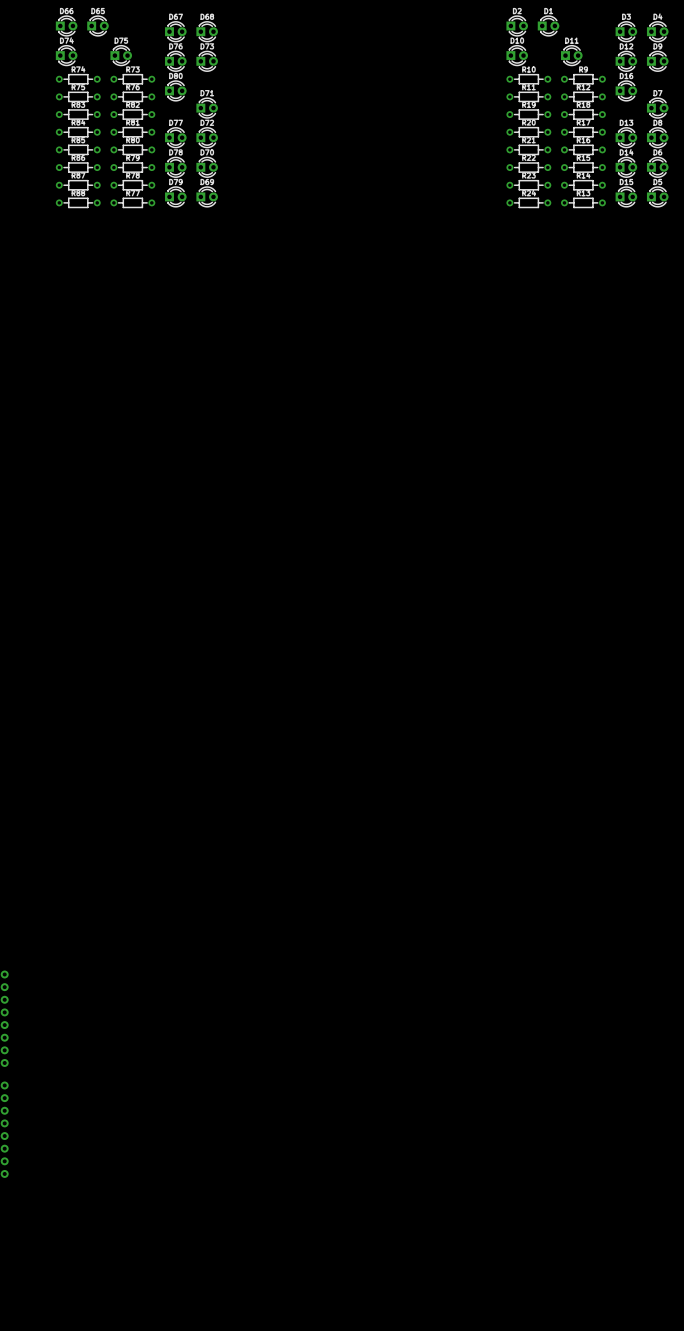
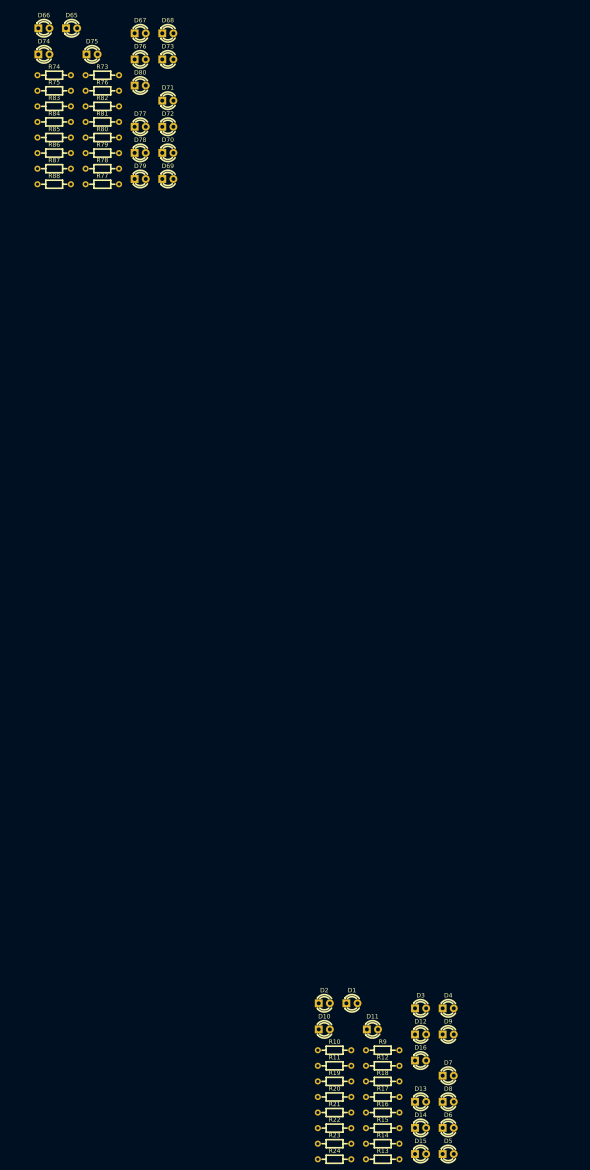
part position: (517, 25) -> (324, 1003)
part position: (548, 25) -> (351, 1003)
part position: (626, 31) -> (420, 1008)
part position: (657, 31) -> (448, 1008)
part position: (517, 55) -> (324, 1029)
part position: (571, 55) -> (372, 1029)
part position: (626, 61) -> (420, 1034)
part position: (657, 61) -> (448, 1034)
part position: (528, 79) -> (334, 1050)
part position: (583, 79) -> (382, 1050)
part position: (626, 90) -> (420, 1060)
part position: (528, 96) -> (334, 1065)
part position: (583, 96) -> (382, 1065)
part position: (657, 108) -> (448, 1075)
part position: (528, 114) -> (334, 1081)
part position: (583, 114) -> (382, 1081)
part position: (528, 132) -> (334, 1096)
part position: (583, 132) -> (382, 1096)
part position: (626, 137) -> (420, 1101)
part position: (657, 137) -> (448, 1101)
part position: (528, 149) -> (334, 1112)
part position: (583, 149) -> (382, 1112)
part position: (528, 167) -> (334, 1128)
part position: (583, 167) -> (382, 1128)
part position: (626, 167) -> (420, 1127)
part position: (657, 167) -> (448, 1127)
part position: (528, 185) -> (334, 1143)
part position: (583, 185) -> (382, 1143)
part position: (626, 196) -> (420, 1154)
part position: (657, 196) -> (448, 1154)
part position: (528, 202) -> (334, 1159)
part position: (583, 202) -> (382, 1159)

